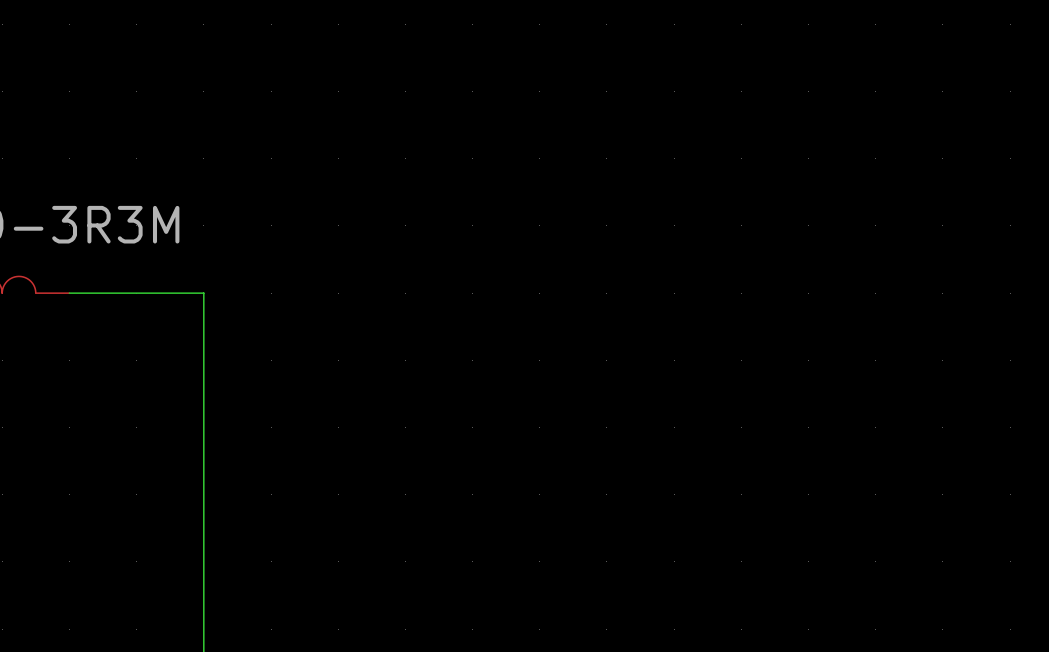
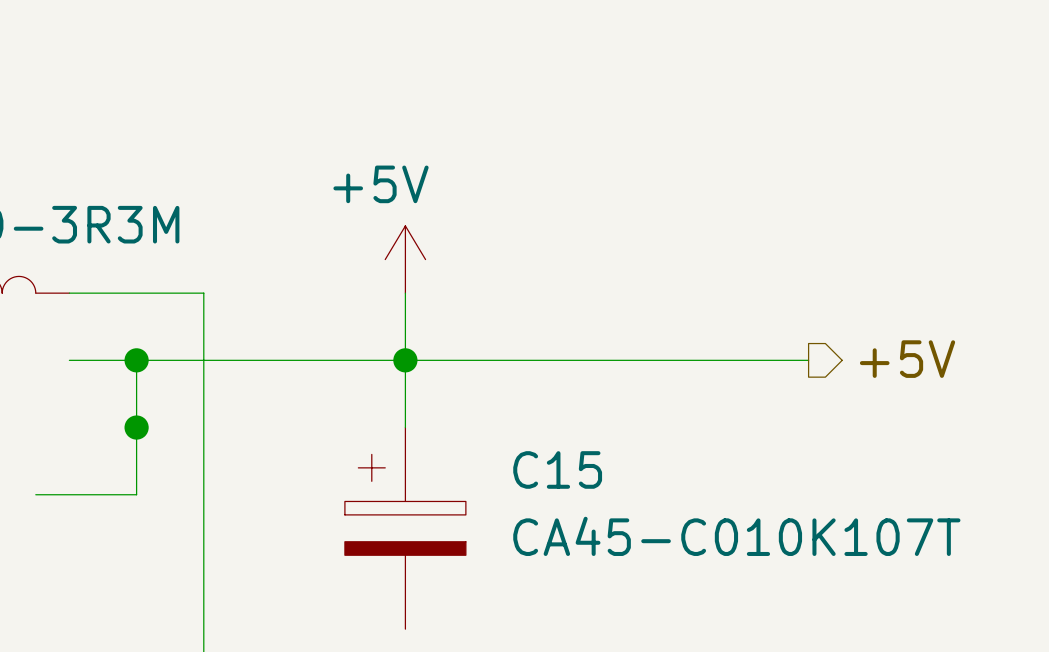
power symbol: none -> +5V (405, 259)
wire: none -> (405, 293) (405, 427)
hierarchical label: none -> +5V (907, 359)
wire: none -> (69, 360) (808, 360)
wire: none -> (136, 360) (136, 494) (35, 494)
junction: none -> (136, 360)
junction: none -> (405, 360)
junction: none -> (136, 427)
C15: none -> CA45-C010K107T (405, 528)

